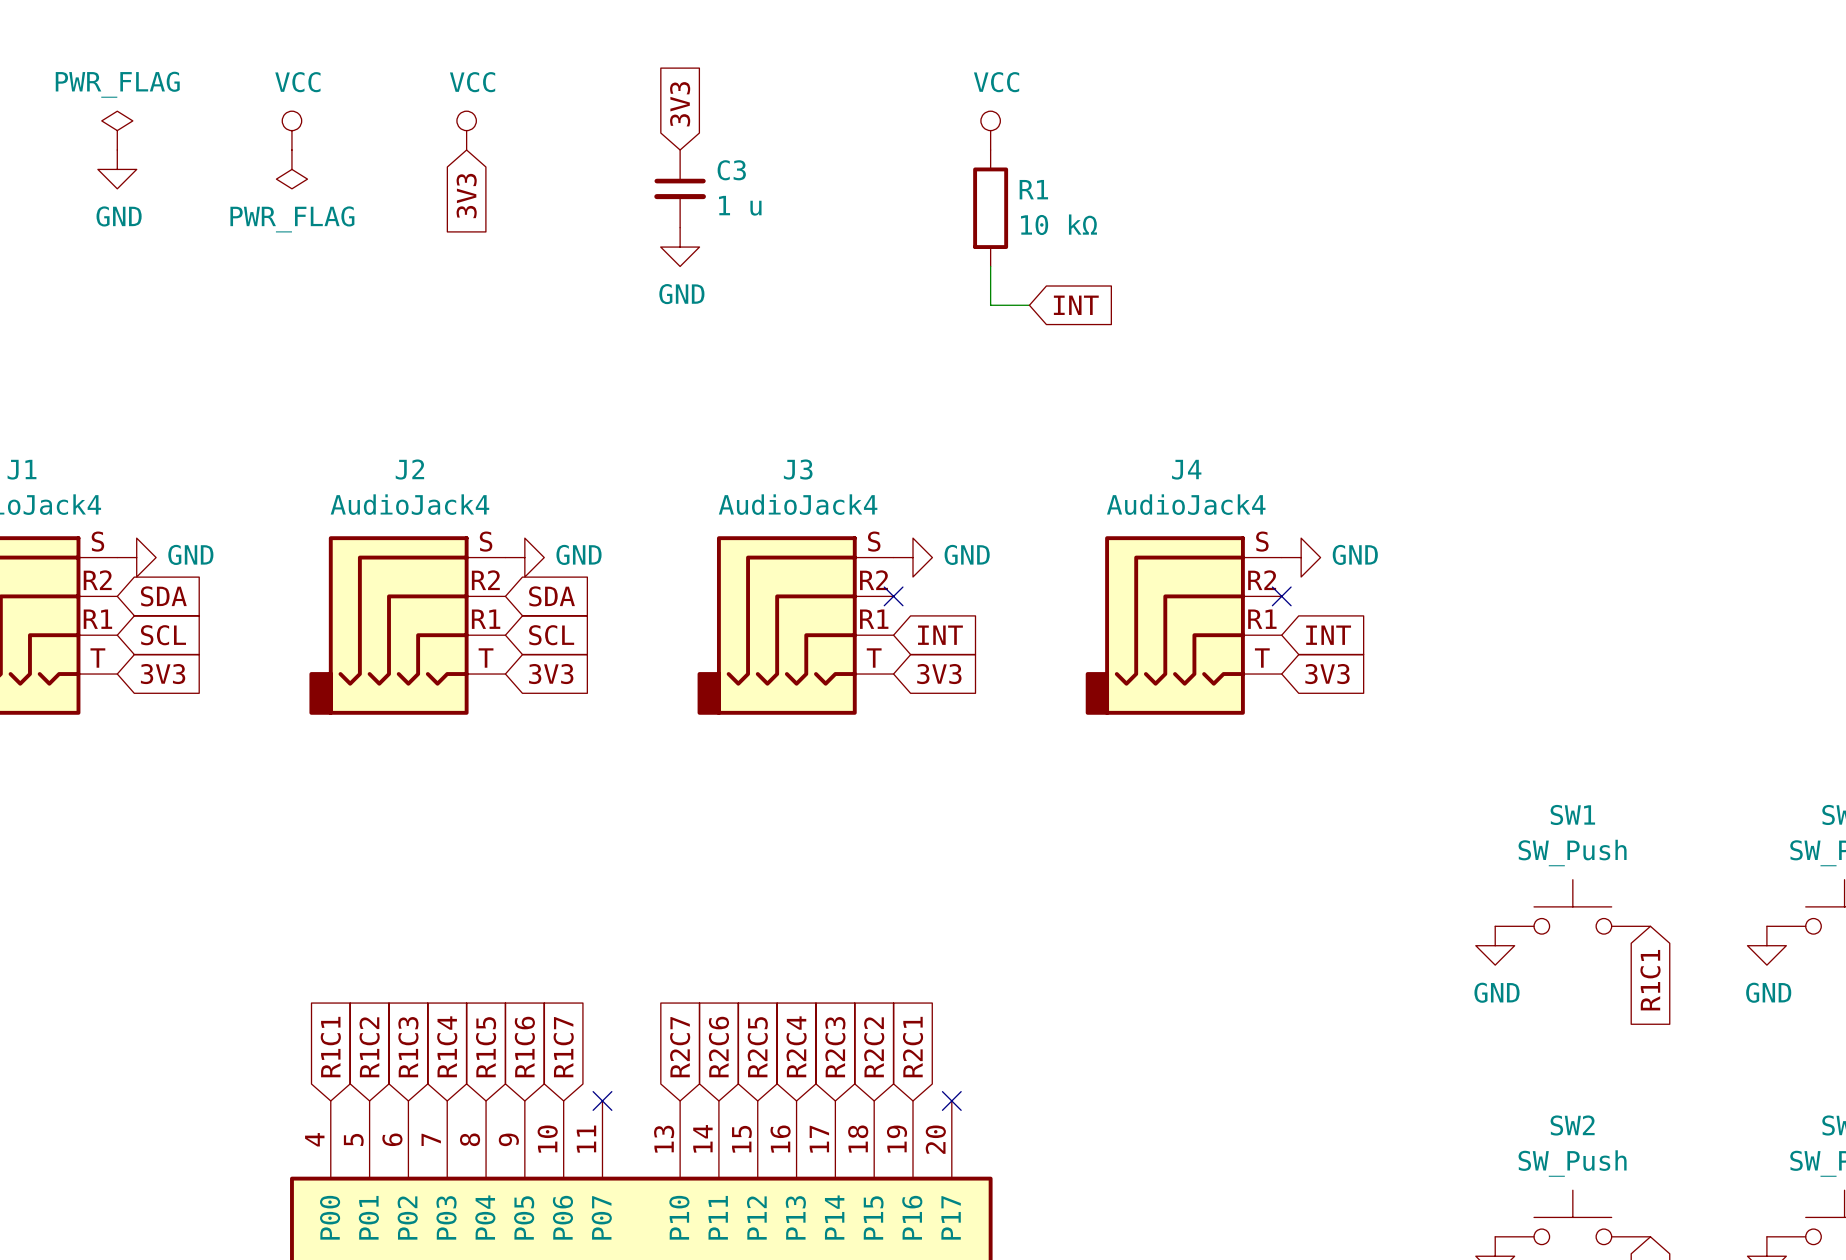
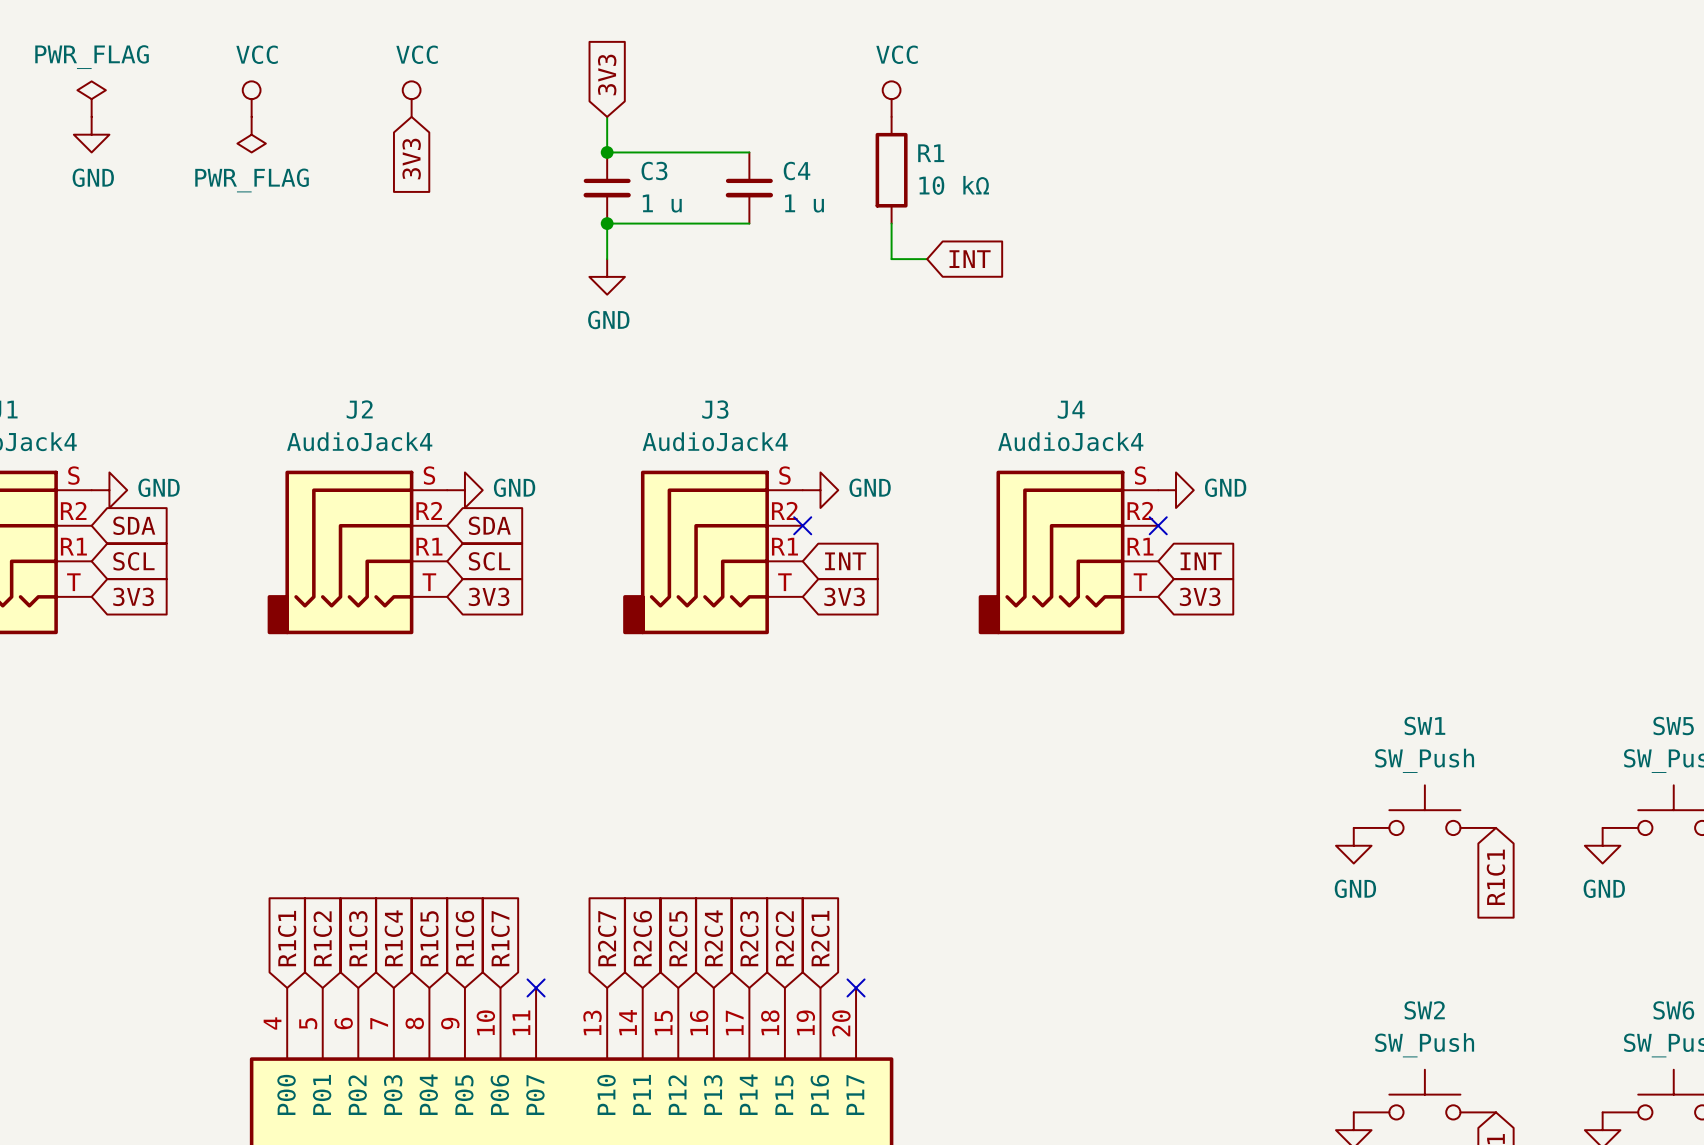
wire: none -> (607, 116) (607, 152) (749, 152)
C3 position: (680, 188) -> (607, 188)
junction: none -> (607, 152)
C4: none -> 1 u (749, 188)
power symbol position: GND (680, 247) -> GND (607, 276)
junction: none -> (607, 223)
wire: none -> (749, 223) (607, 223) (607, 259)

